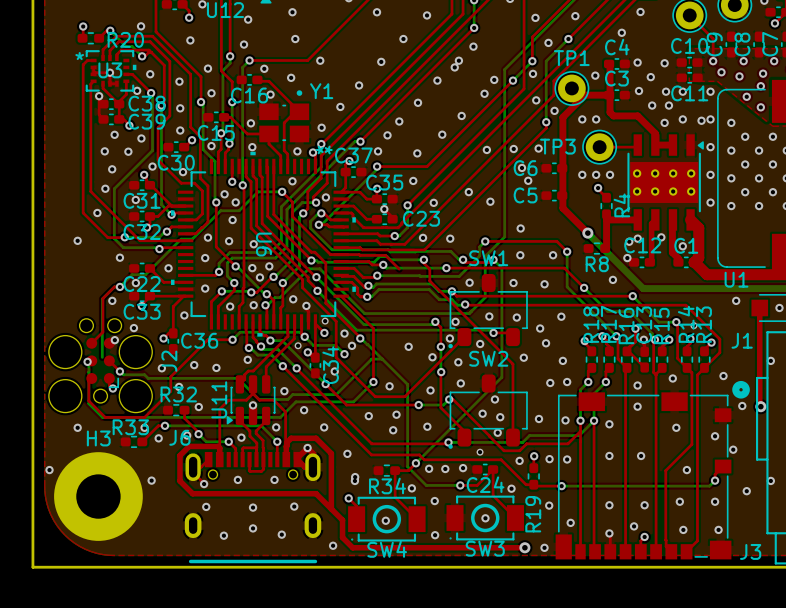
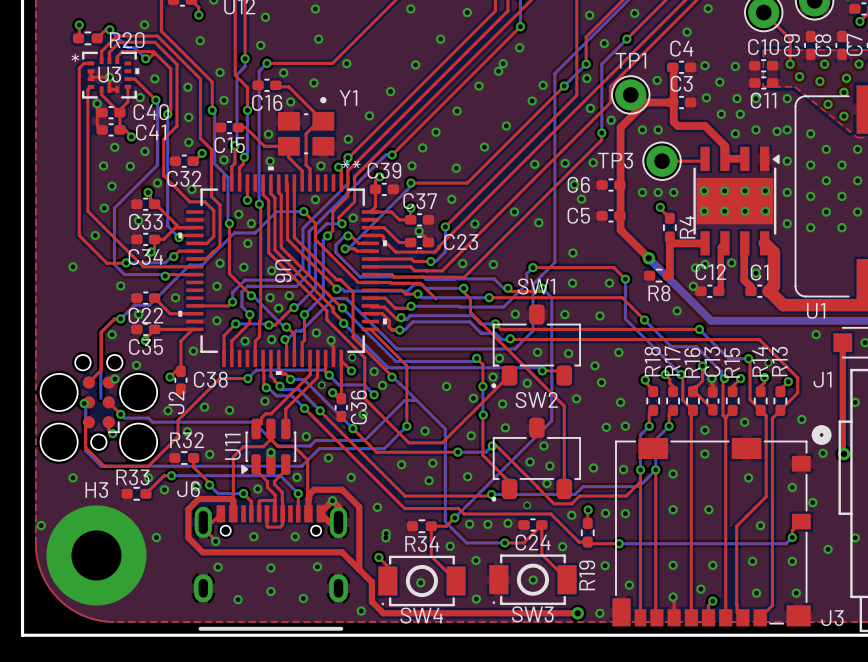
C38 name: C38 (146, 103) -> C40 (151, 112)
C39 name: C39 (146, 121) -> C41 (150, 132)
C37 name: C37 (353, 155) -> C39 (384, 170)
C30 name: C30 (176, 162) -> C32 (184, 178)
C35 name: C35 (384, 182) -> C37 (420, 201)
C31 name: C31 (142, 200) -> C33 (145, 221)
C32 name: C32 (142, 232) -> C34 (145, 256)
C33 name: C33 (142, 311) -> C35 (145, 346)
C36 name: C36 (199, 340) -> C38 (210, 379)
C34 name: C34 (330, 365) -> C36 (358, 407)

